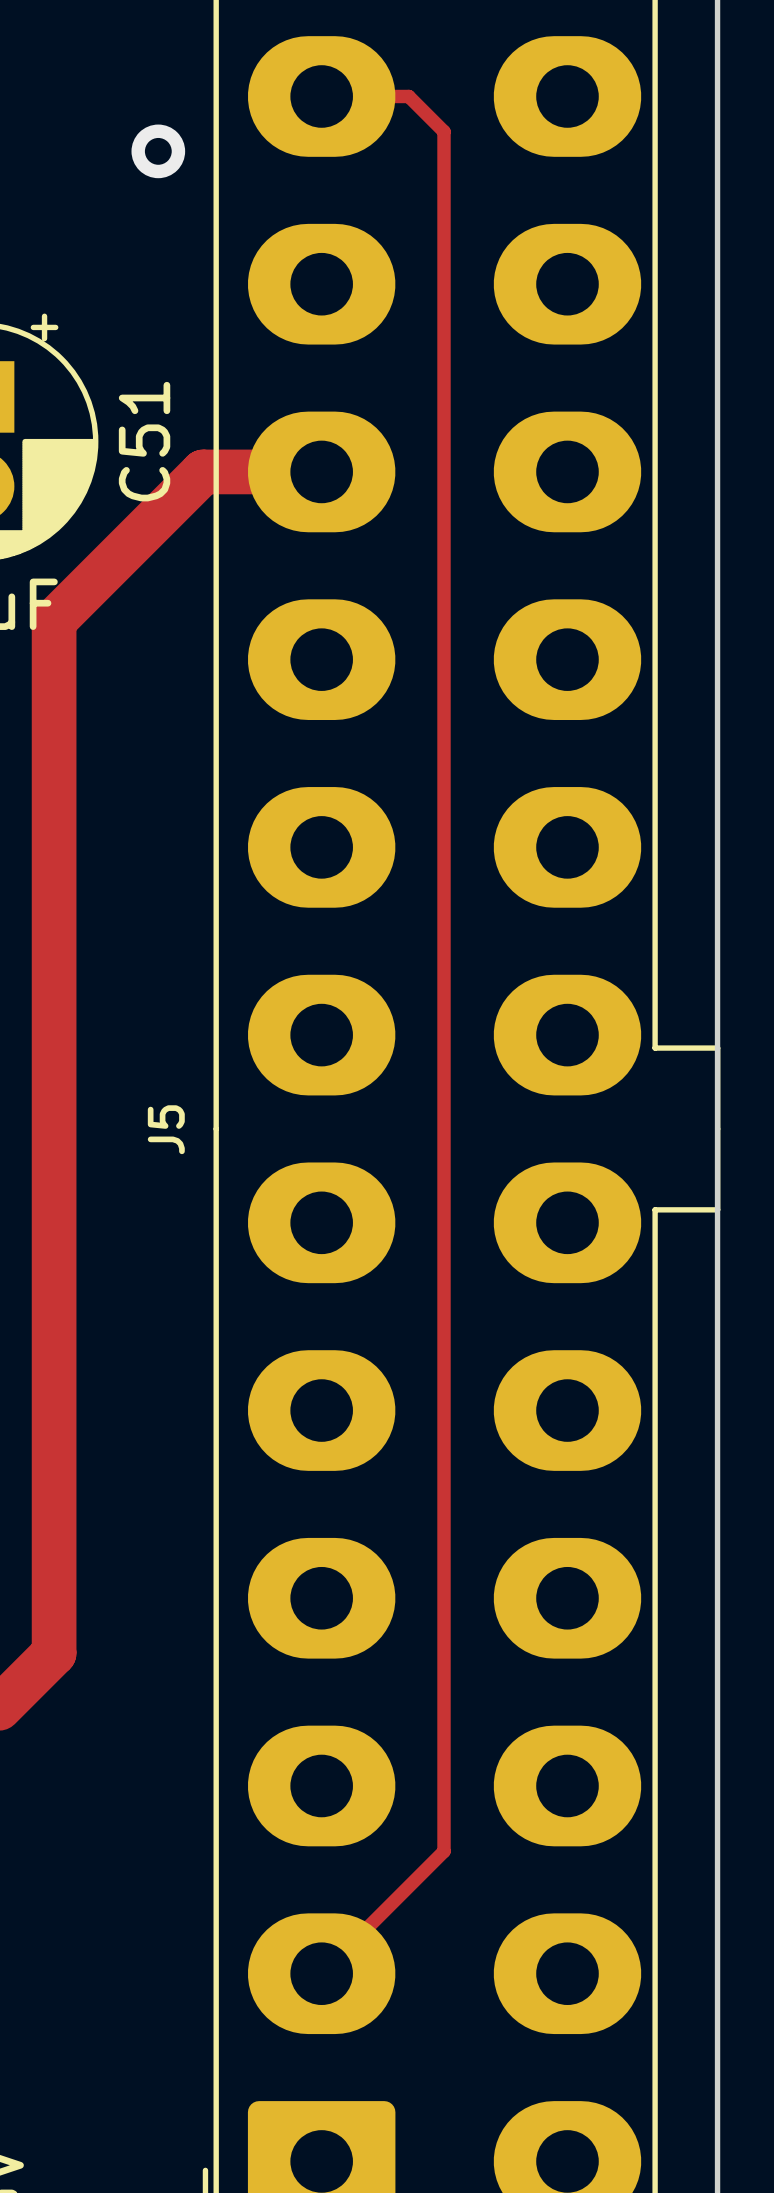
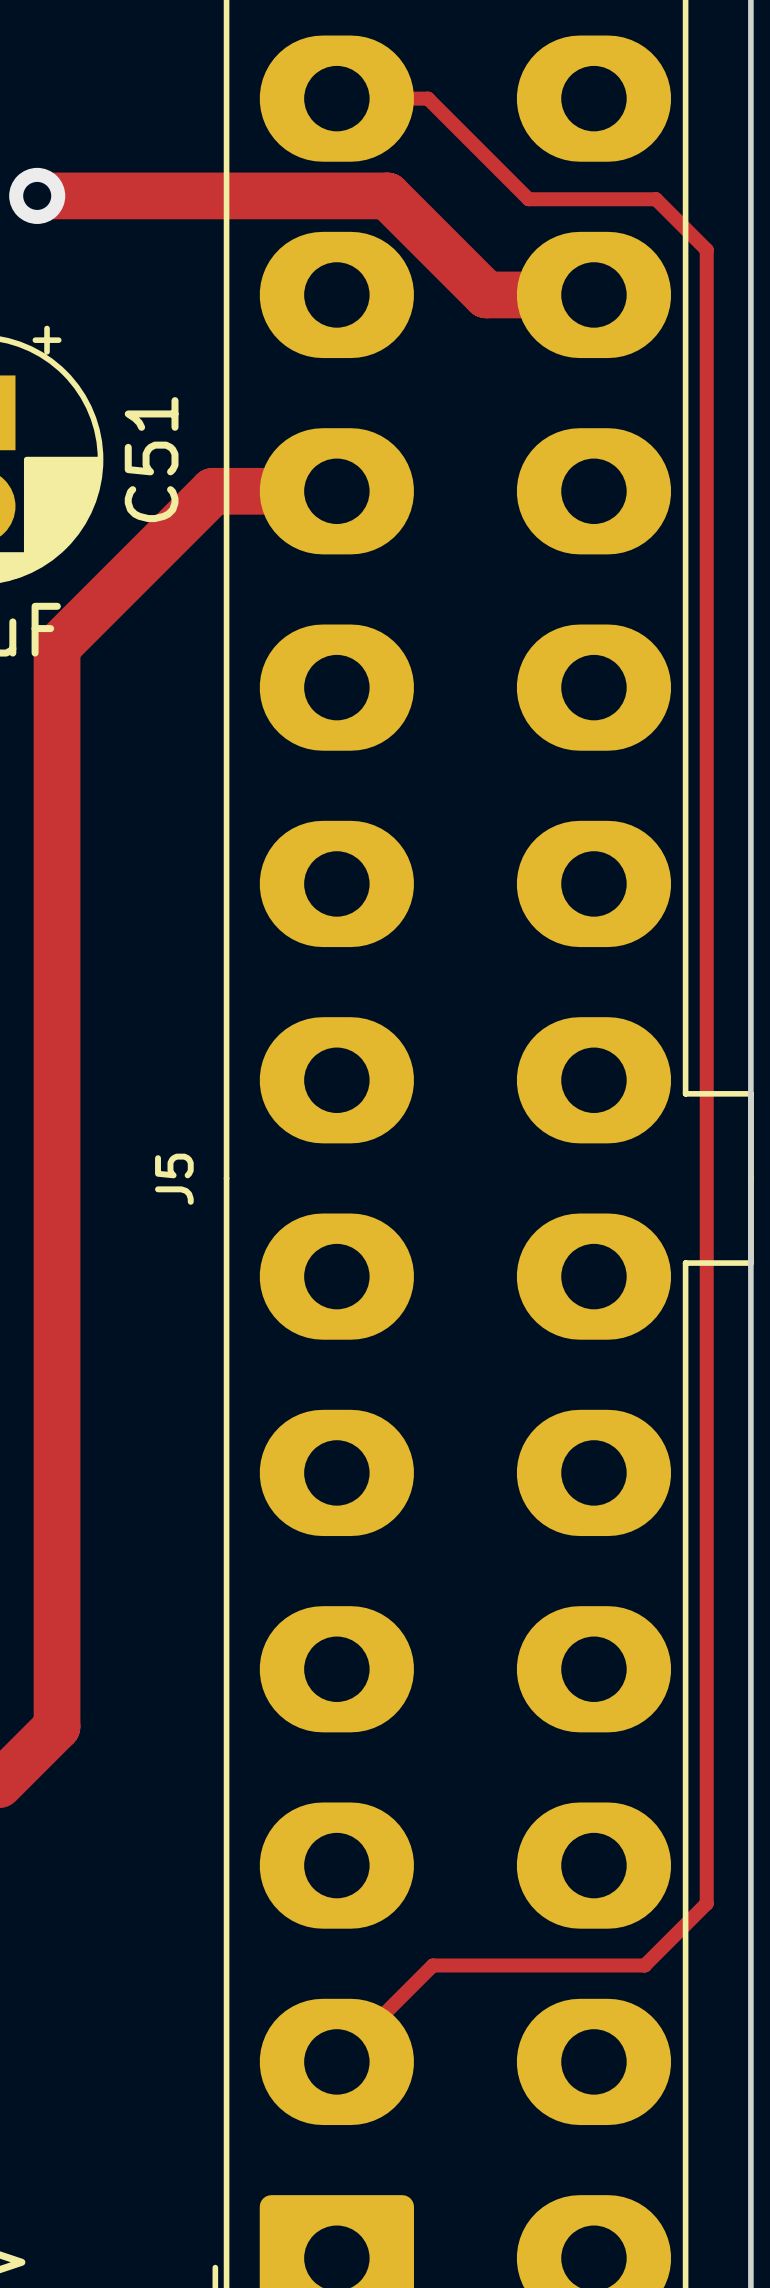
track: (444, 131) (444, 1851) (321, 1973) -> (464, 135) (528, 199) (656, 199) (706, 249) (706, 1903) (644, 1965) (432, 1965) (336, 2061)
via: (158, 151) -> none
track: none -> (37, 195) (387, 195) (486, 294) (593, 294)
via: none -> (37, 195)

